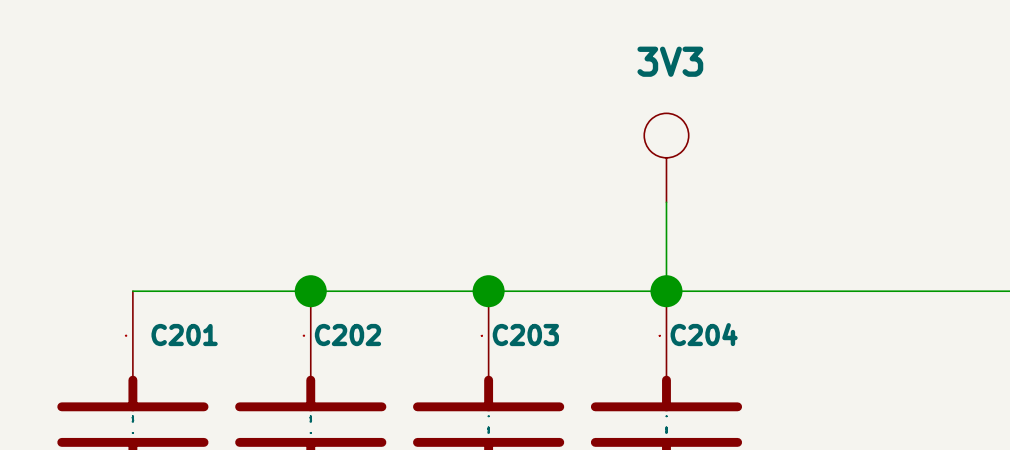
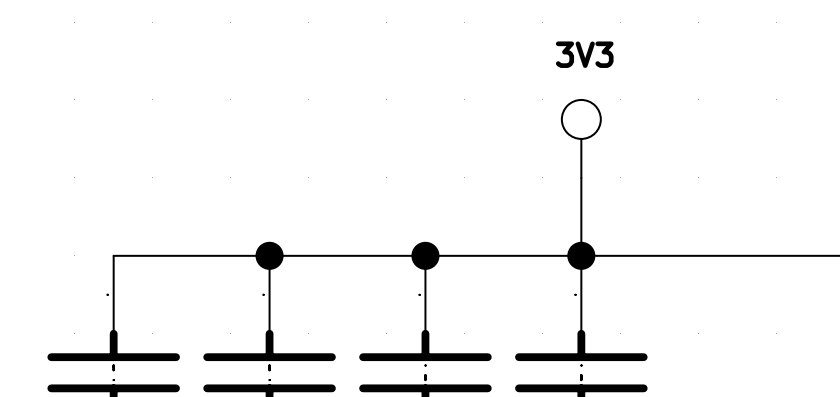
C204 name: C204 (704, 334) -> none
C201 name: C201 (184, 335) -> none
C202 name: C202 (347, 335) -> none
C203 name: C203 (525, 335) -> none

